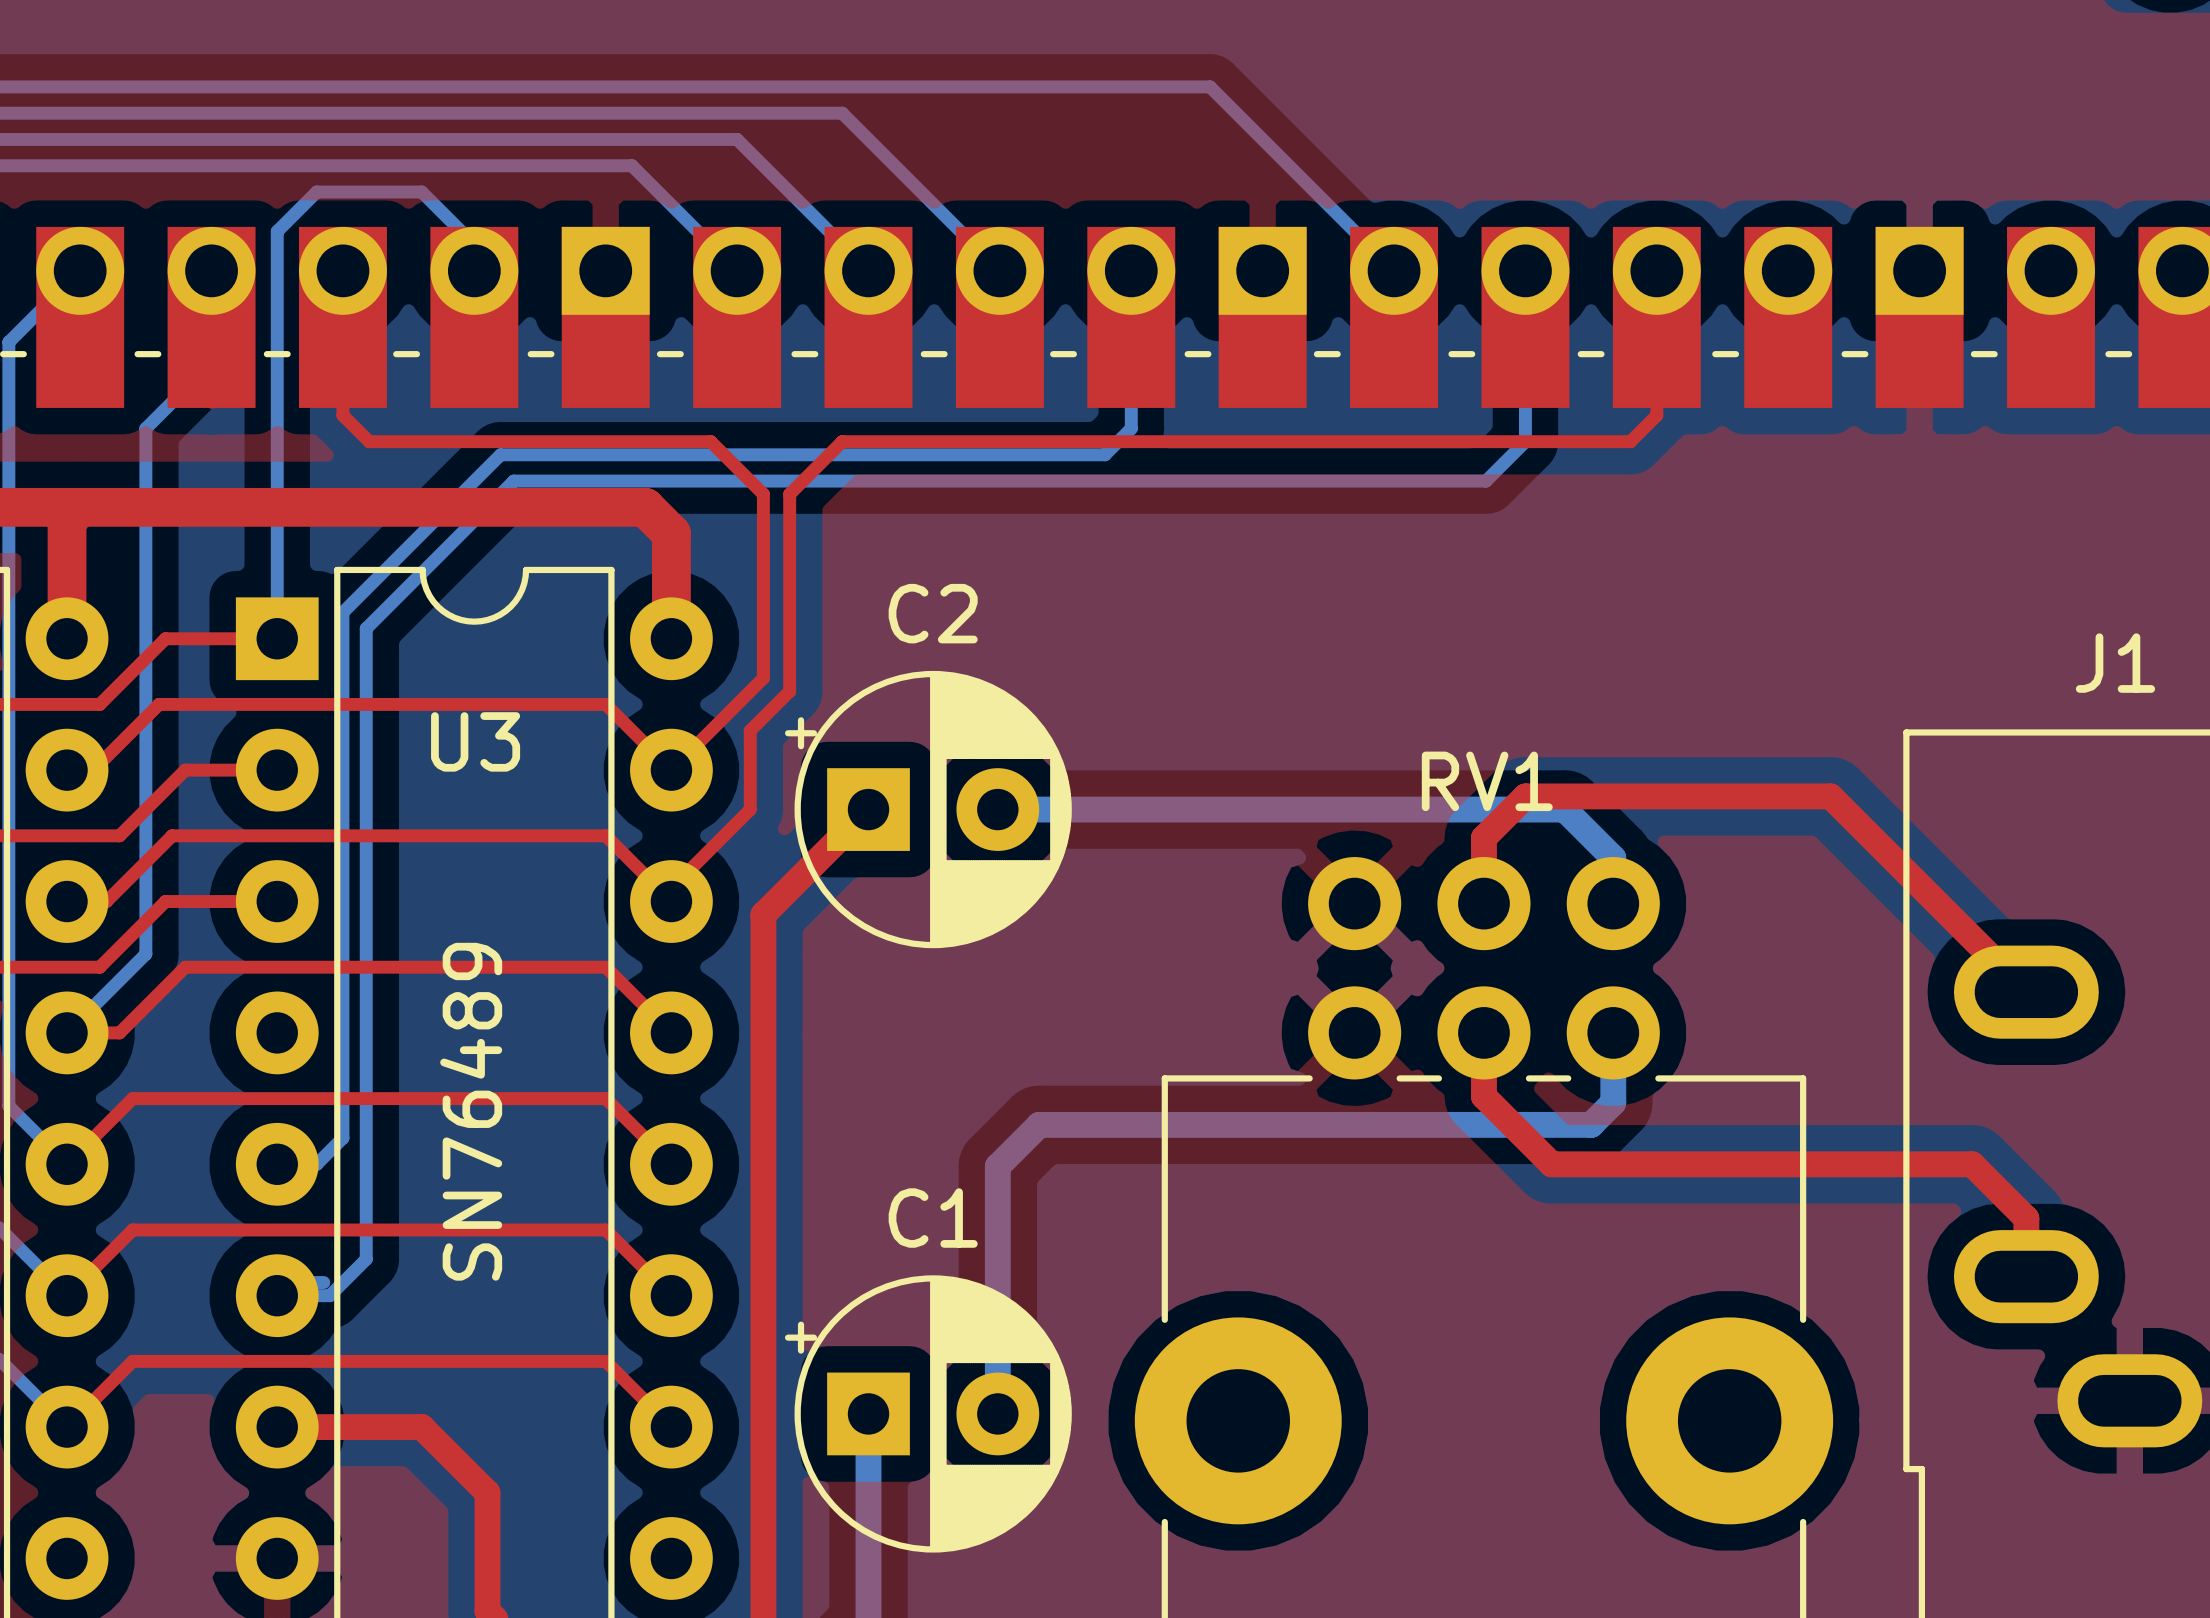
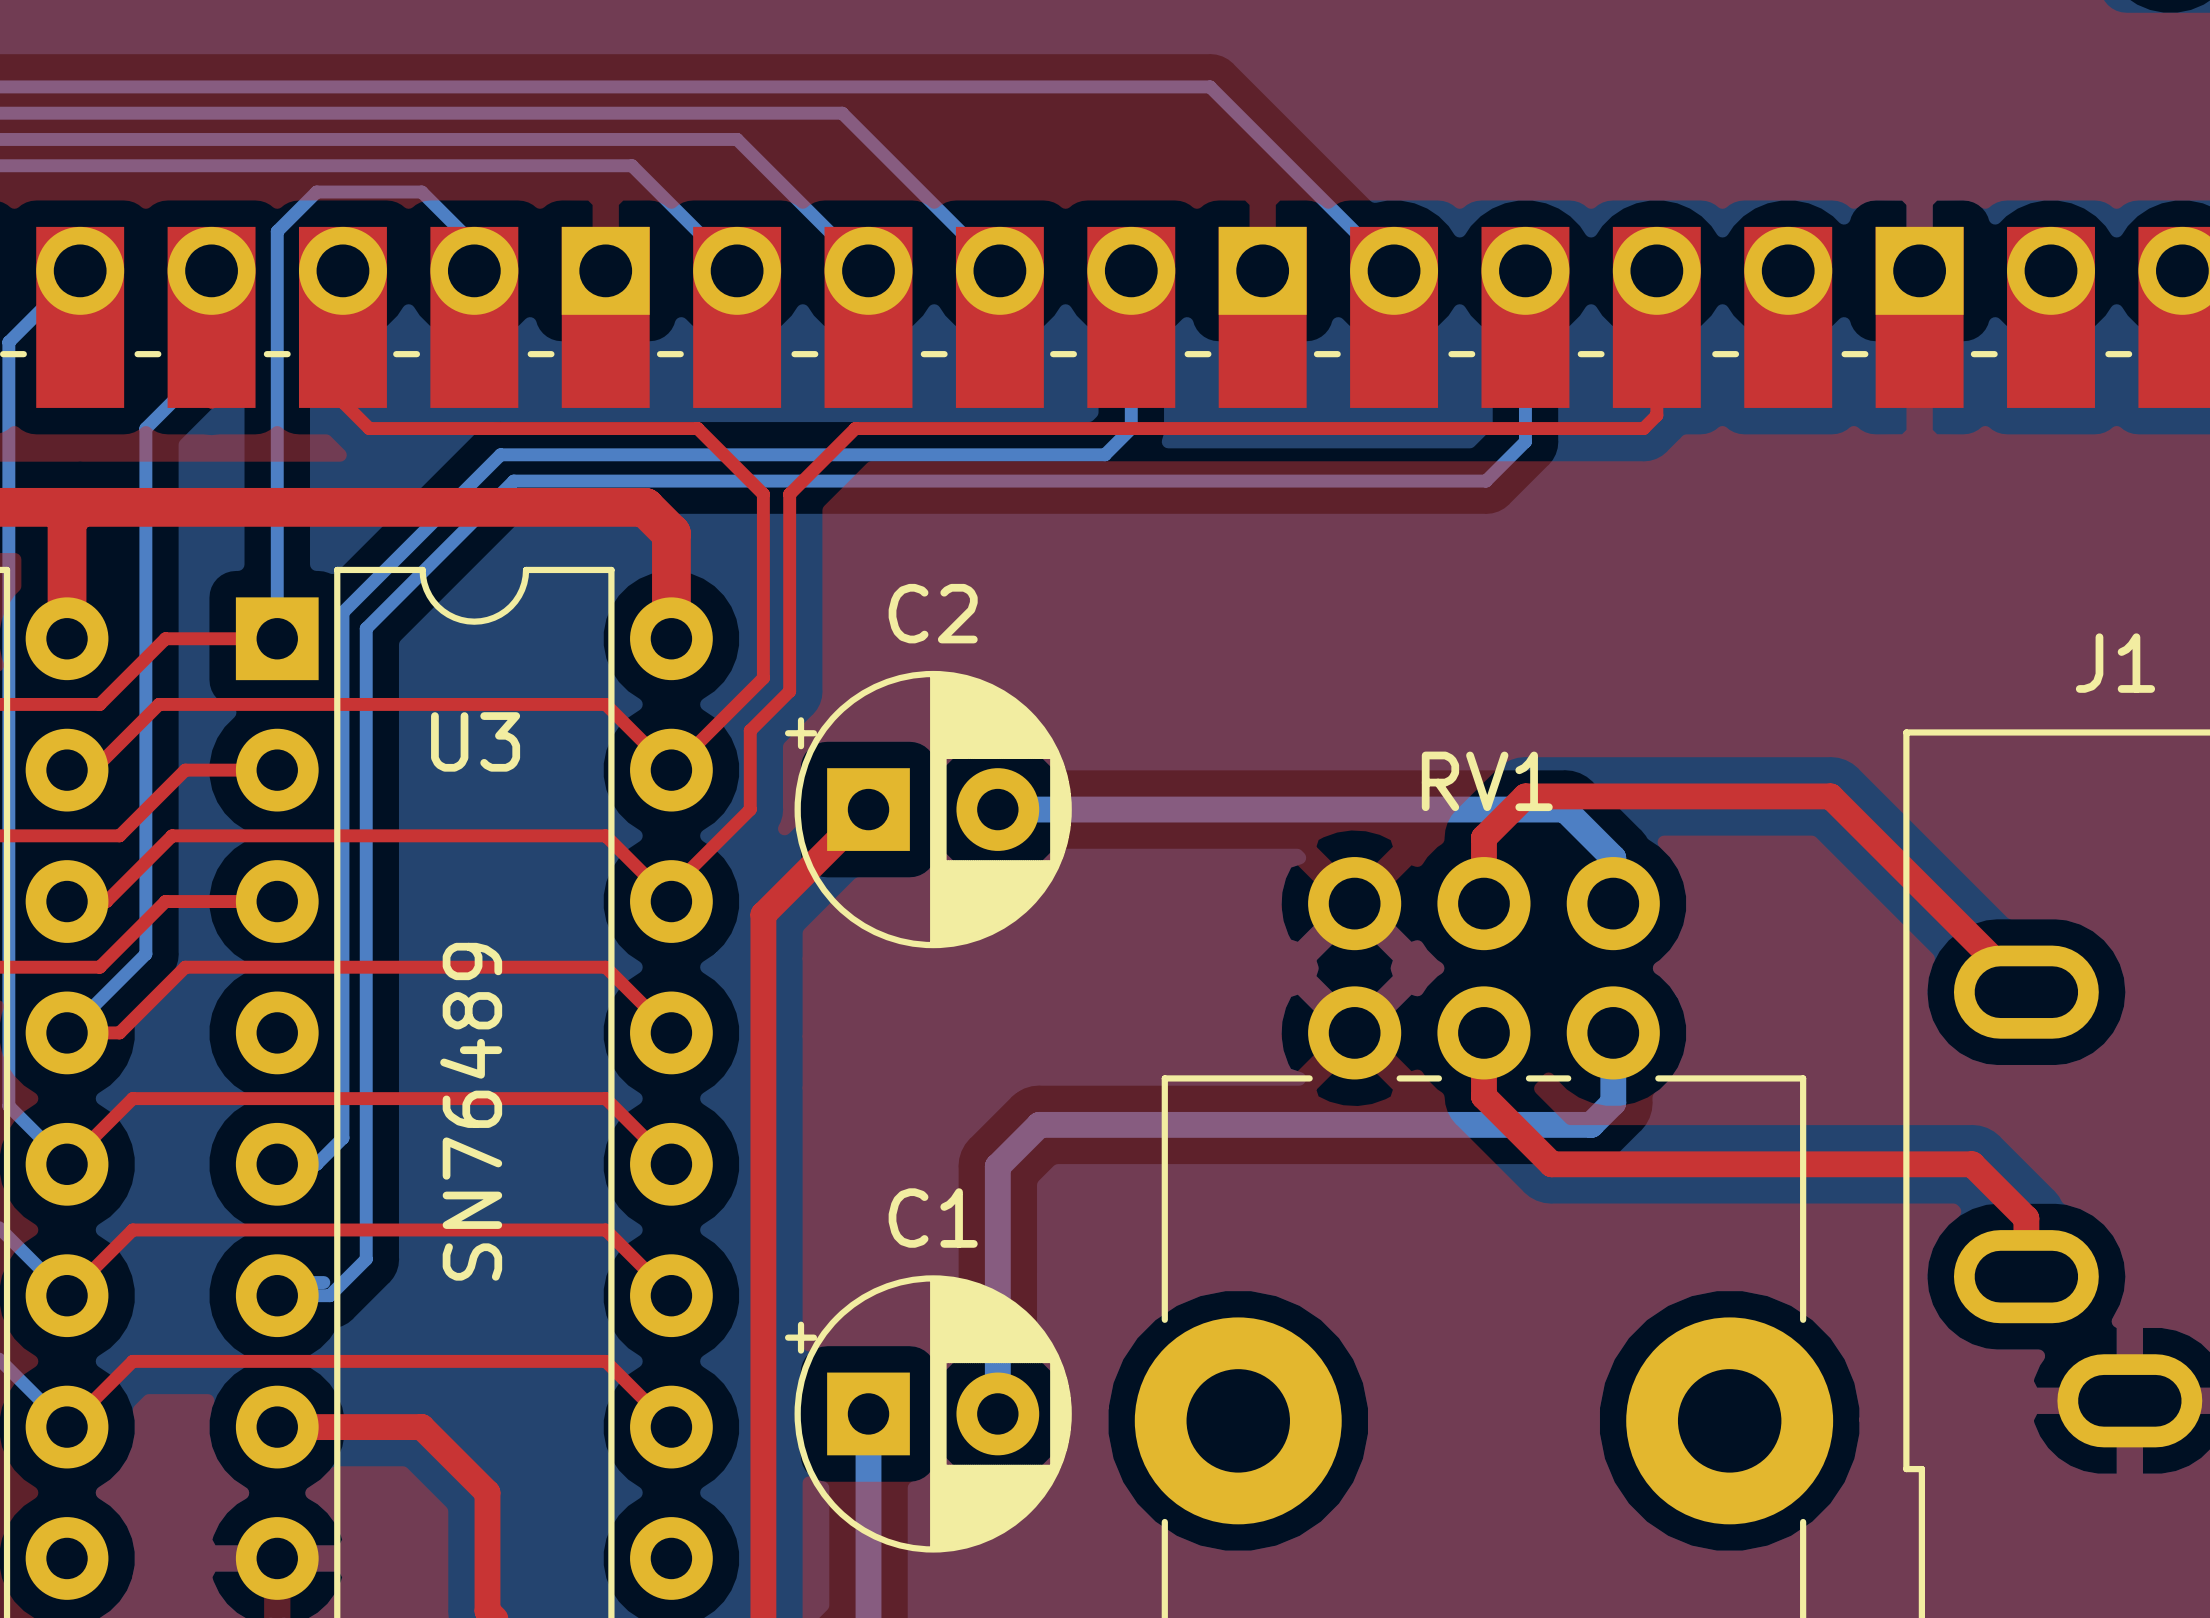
top track: (342, 402) (342, 415) (369, 441) (710, 441) -> (342, 402) (369, 428) (697, 428) (710, 441)
top track: (1643, 428) (1630, 441) (842, 441) -> (1643, 428) (855, 428) (842, 441)

